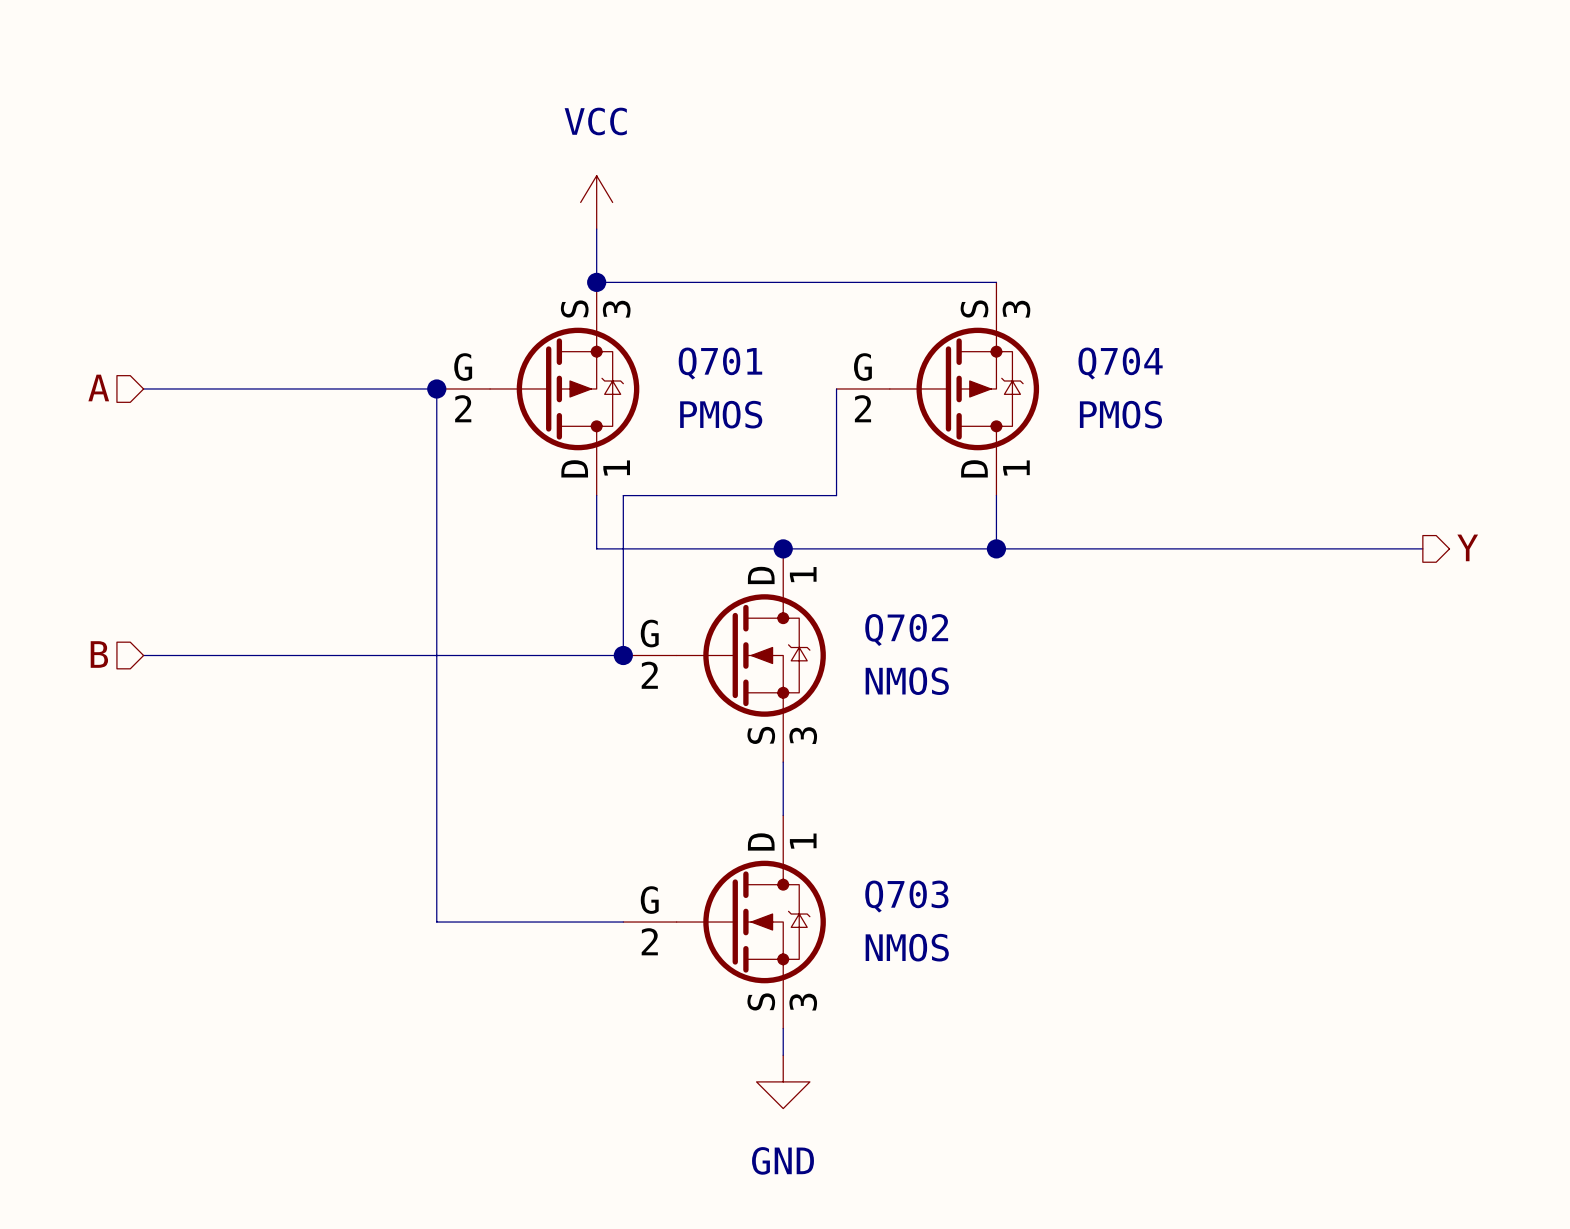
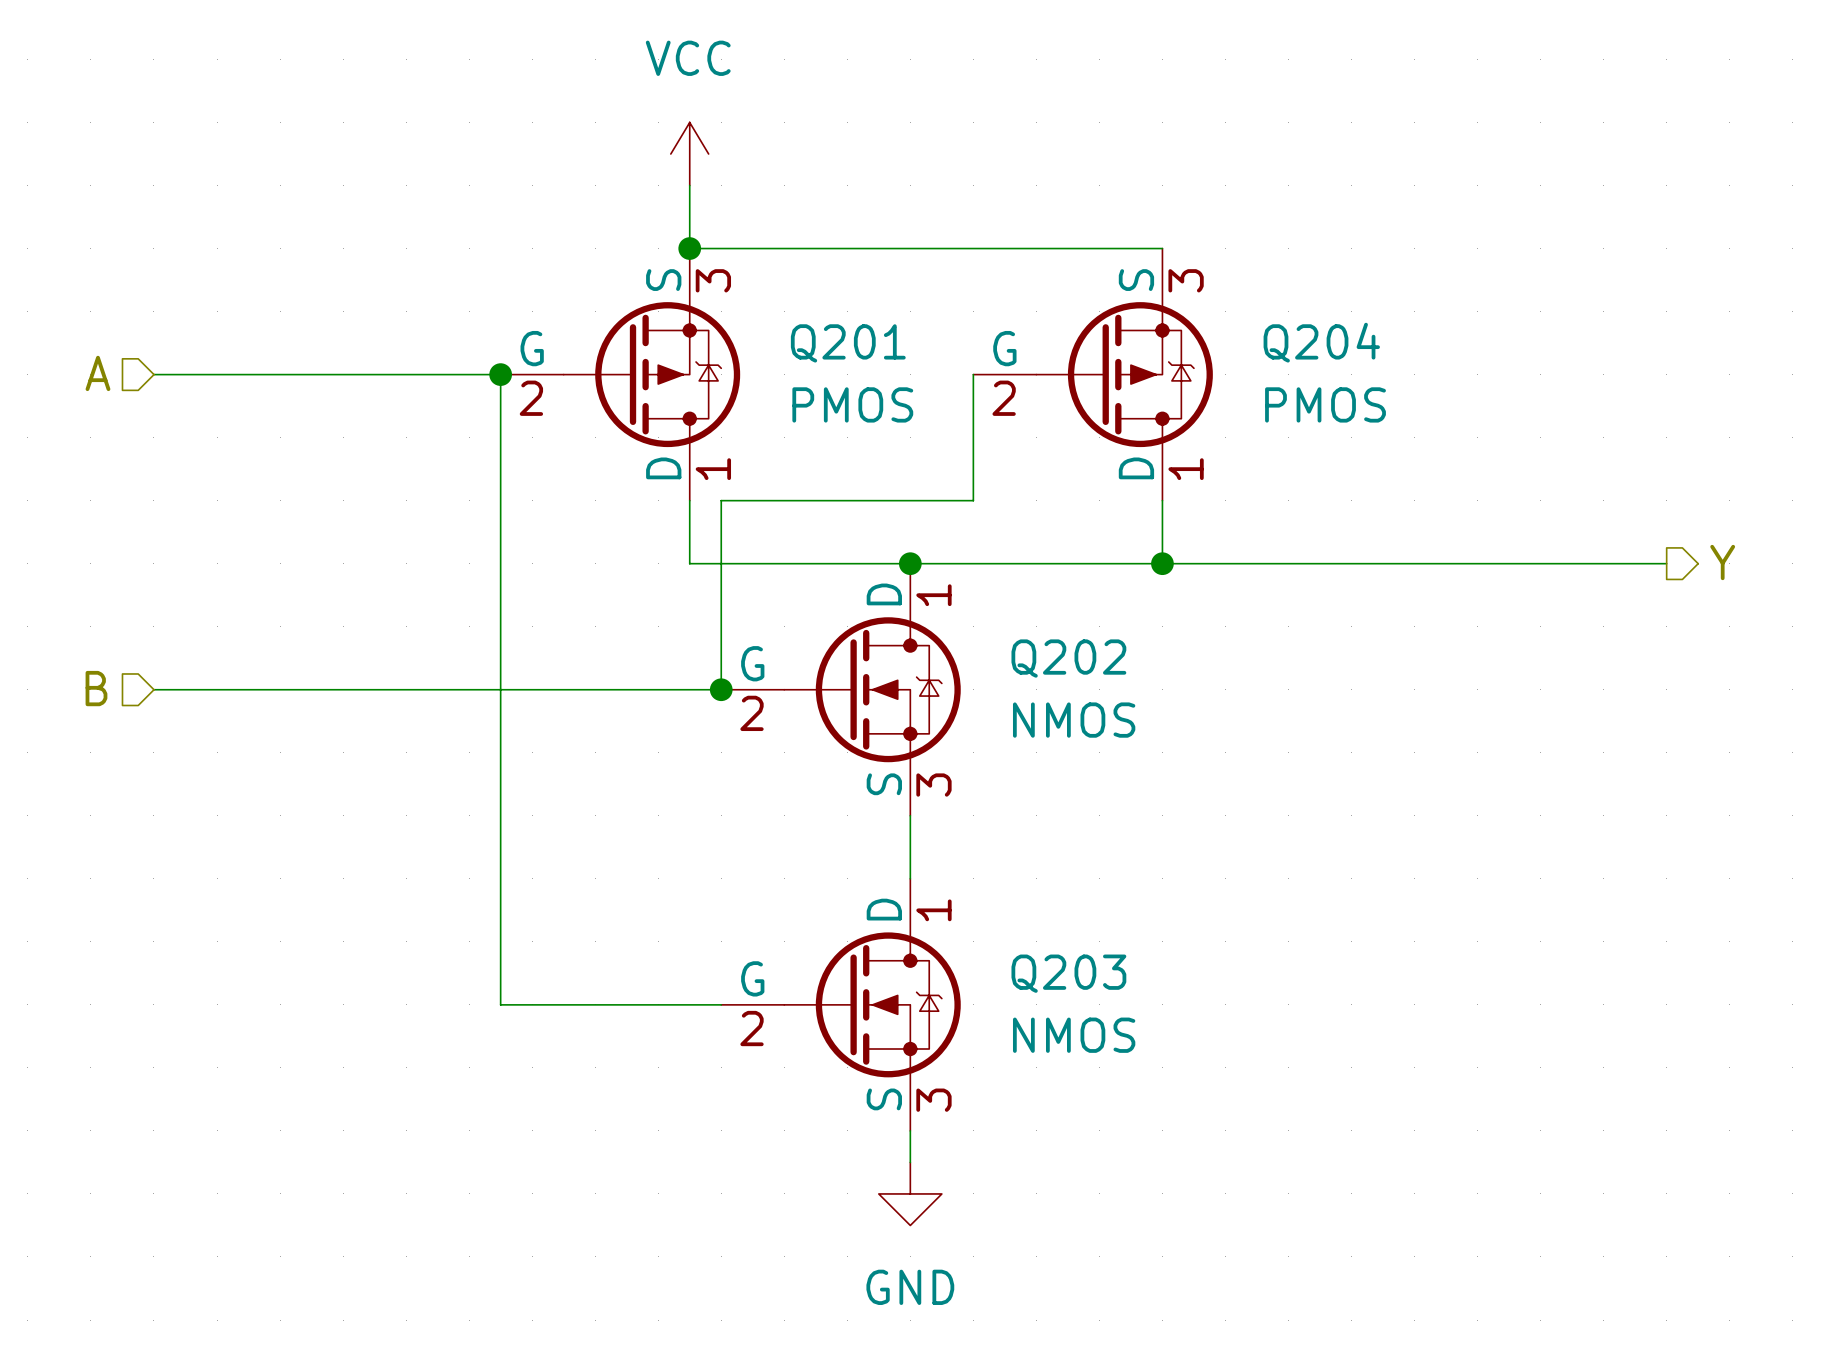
Q701 name: Q701 (720, 363) -> Q201 (848, 343)
Q704 name: Q704 (1120, 363) -> Q204 (1321, 342)
Q702 name: Q702 (906, 630) -> Q202 (1068, 658)
Q703 name: Q703 (906, 896) -> Q203 (1068, 973)

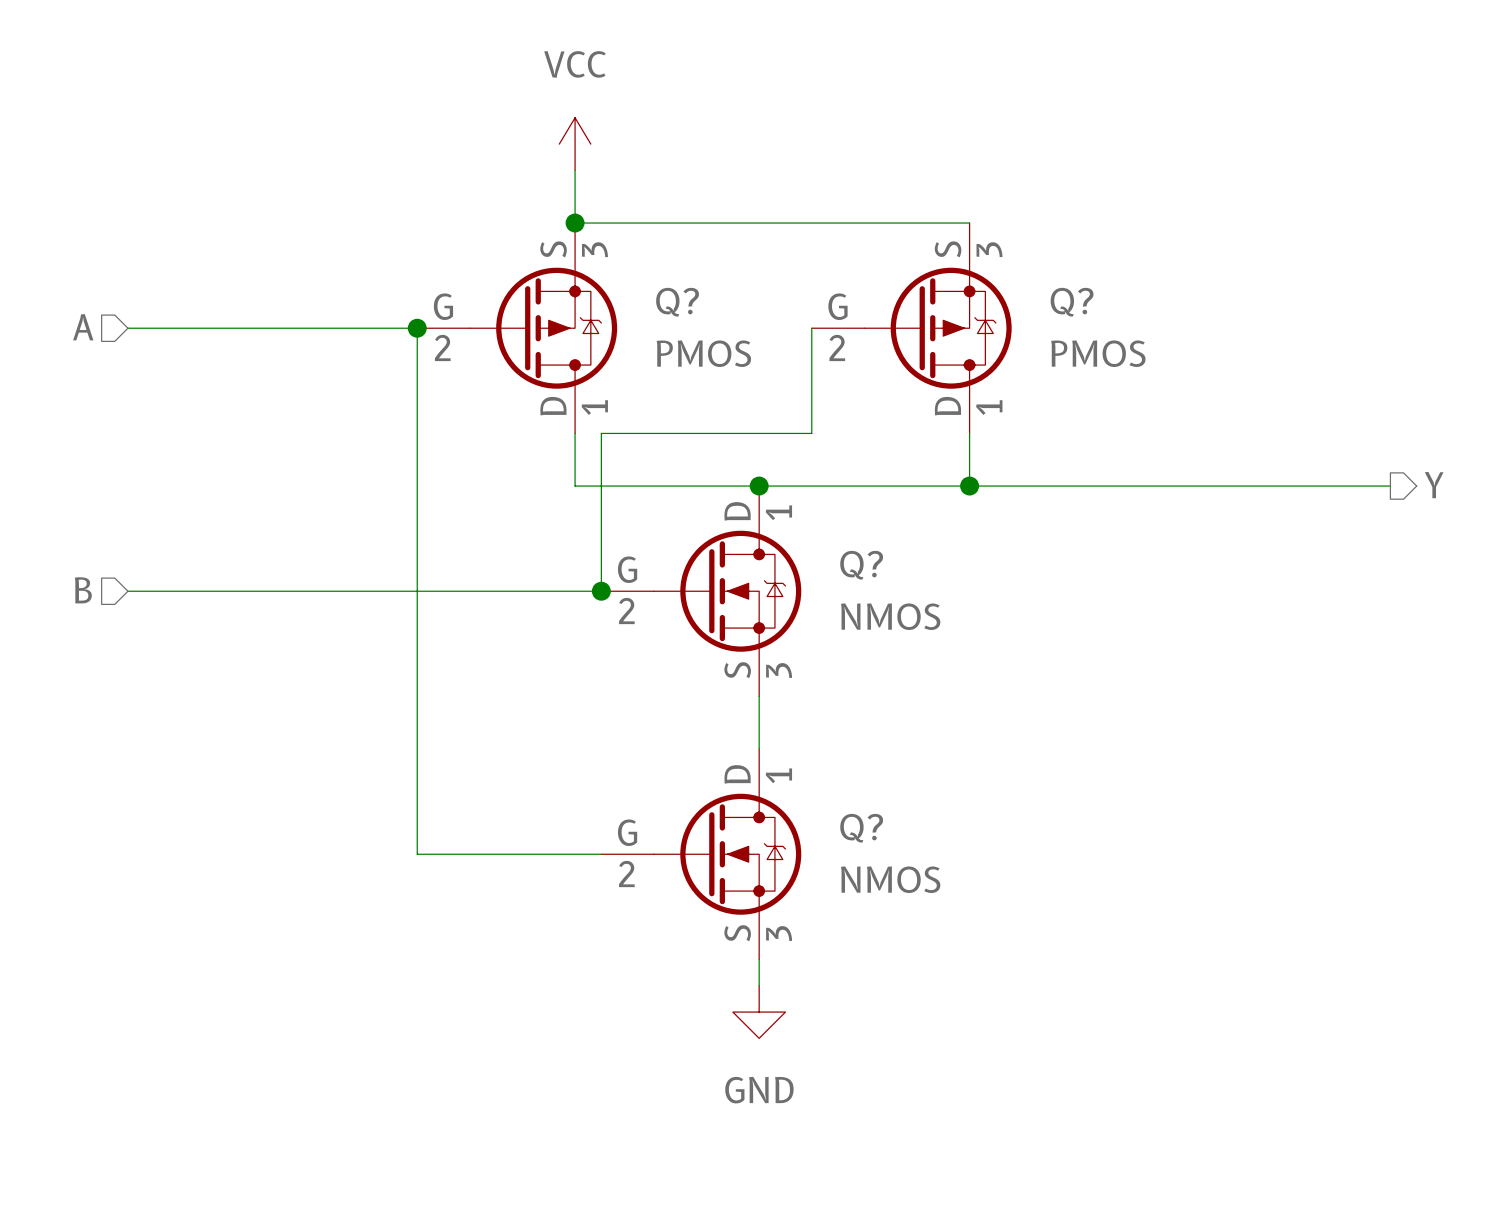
Q204 name: Q204 (1321, 342) -> Q? (1072, 302)
Q201 name: Q201 (848, 343) -> Q? (677, 302)
Q202 name: Q202 (1068, 658) -> Q? (861, 565)
Q203 name: Q203 (1068, 973) -> Q? (861, 828)

